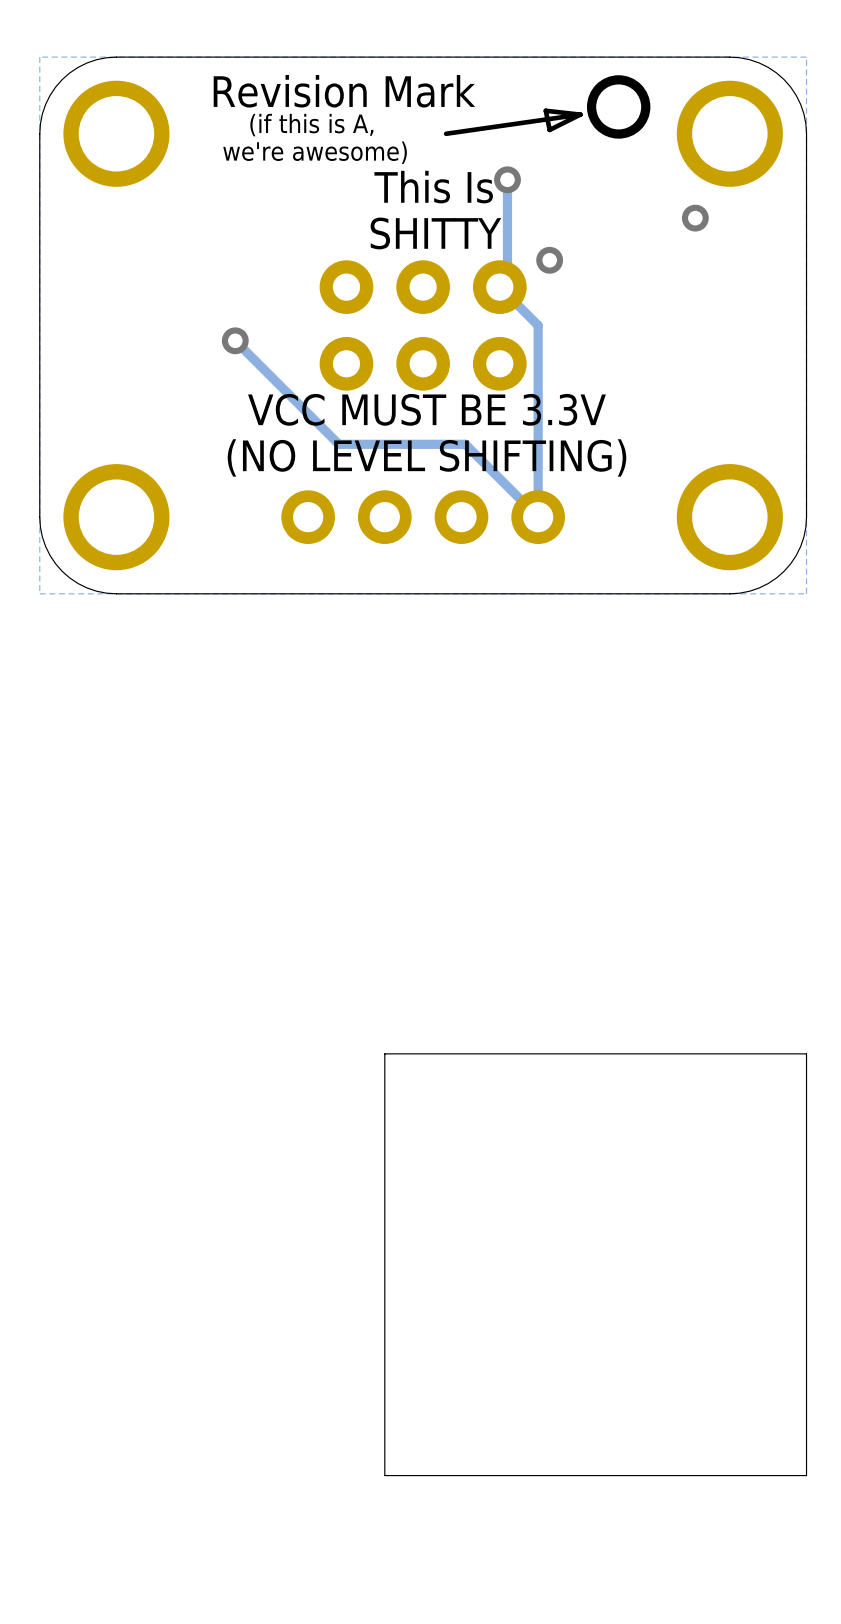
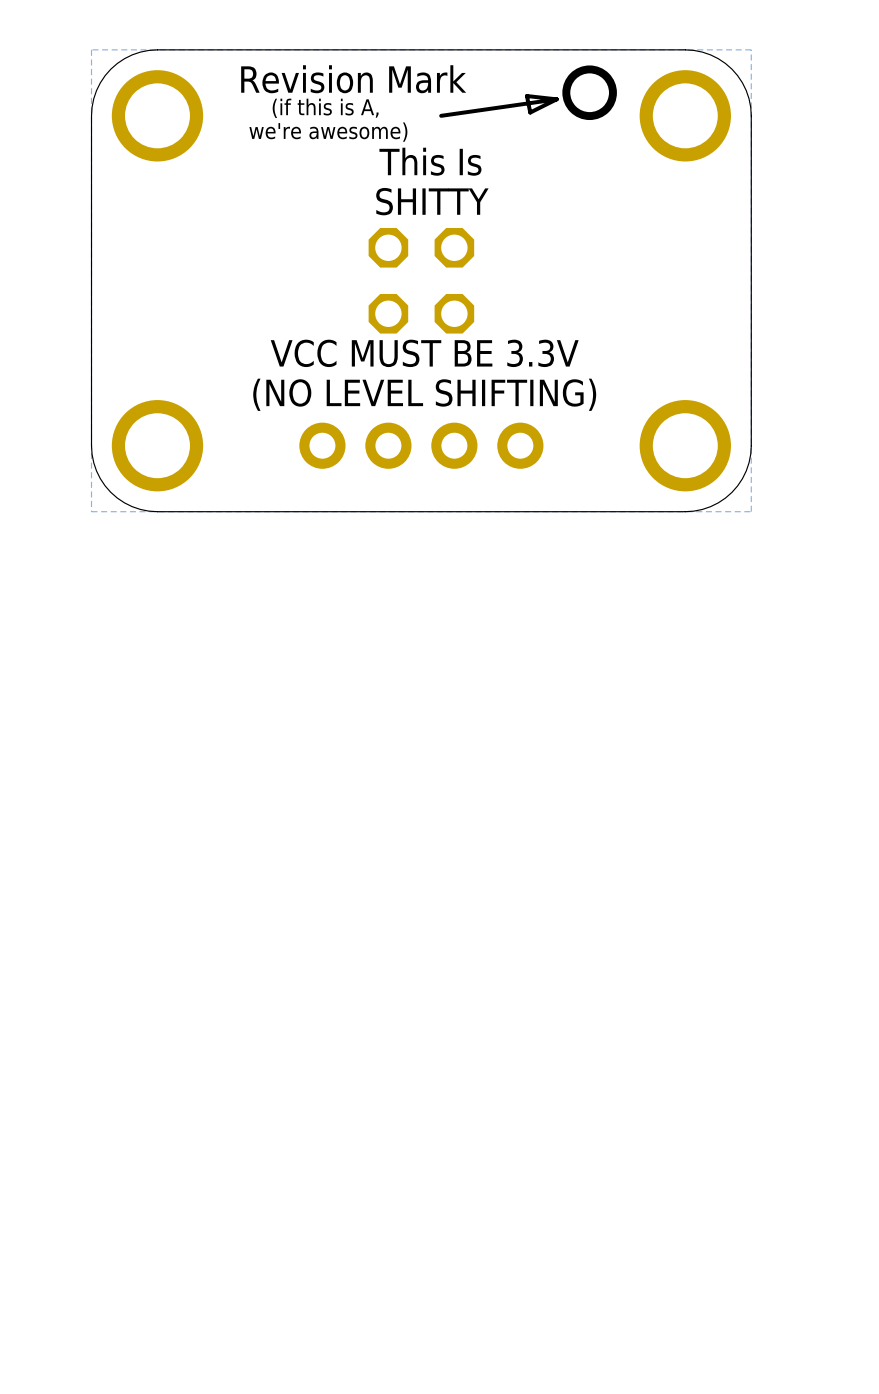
track: (507, 179) (507, 279) (499, 287) (538, 325) (538, 517) (465, 444) (338, 444) (235, 340) -> none
via: (507, 179) -> none
via: (695, 218) -> none
part footprint: [319, 260, 527, 391] -> [368, 227, 475, 334]
via: (549, 260) -> none
via: (235, 340) -> none
board edge: (806, 1053) (384, 1053) (384, 1475) (806, 1475) (806, 1053) -> none

